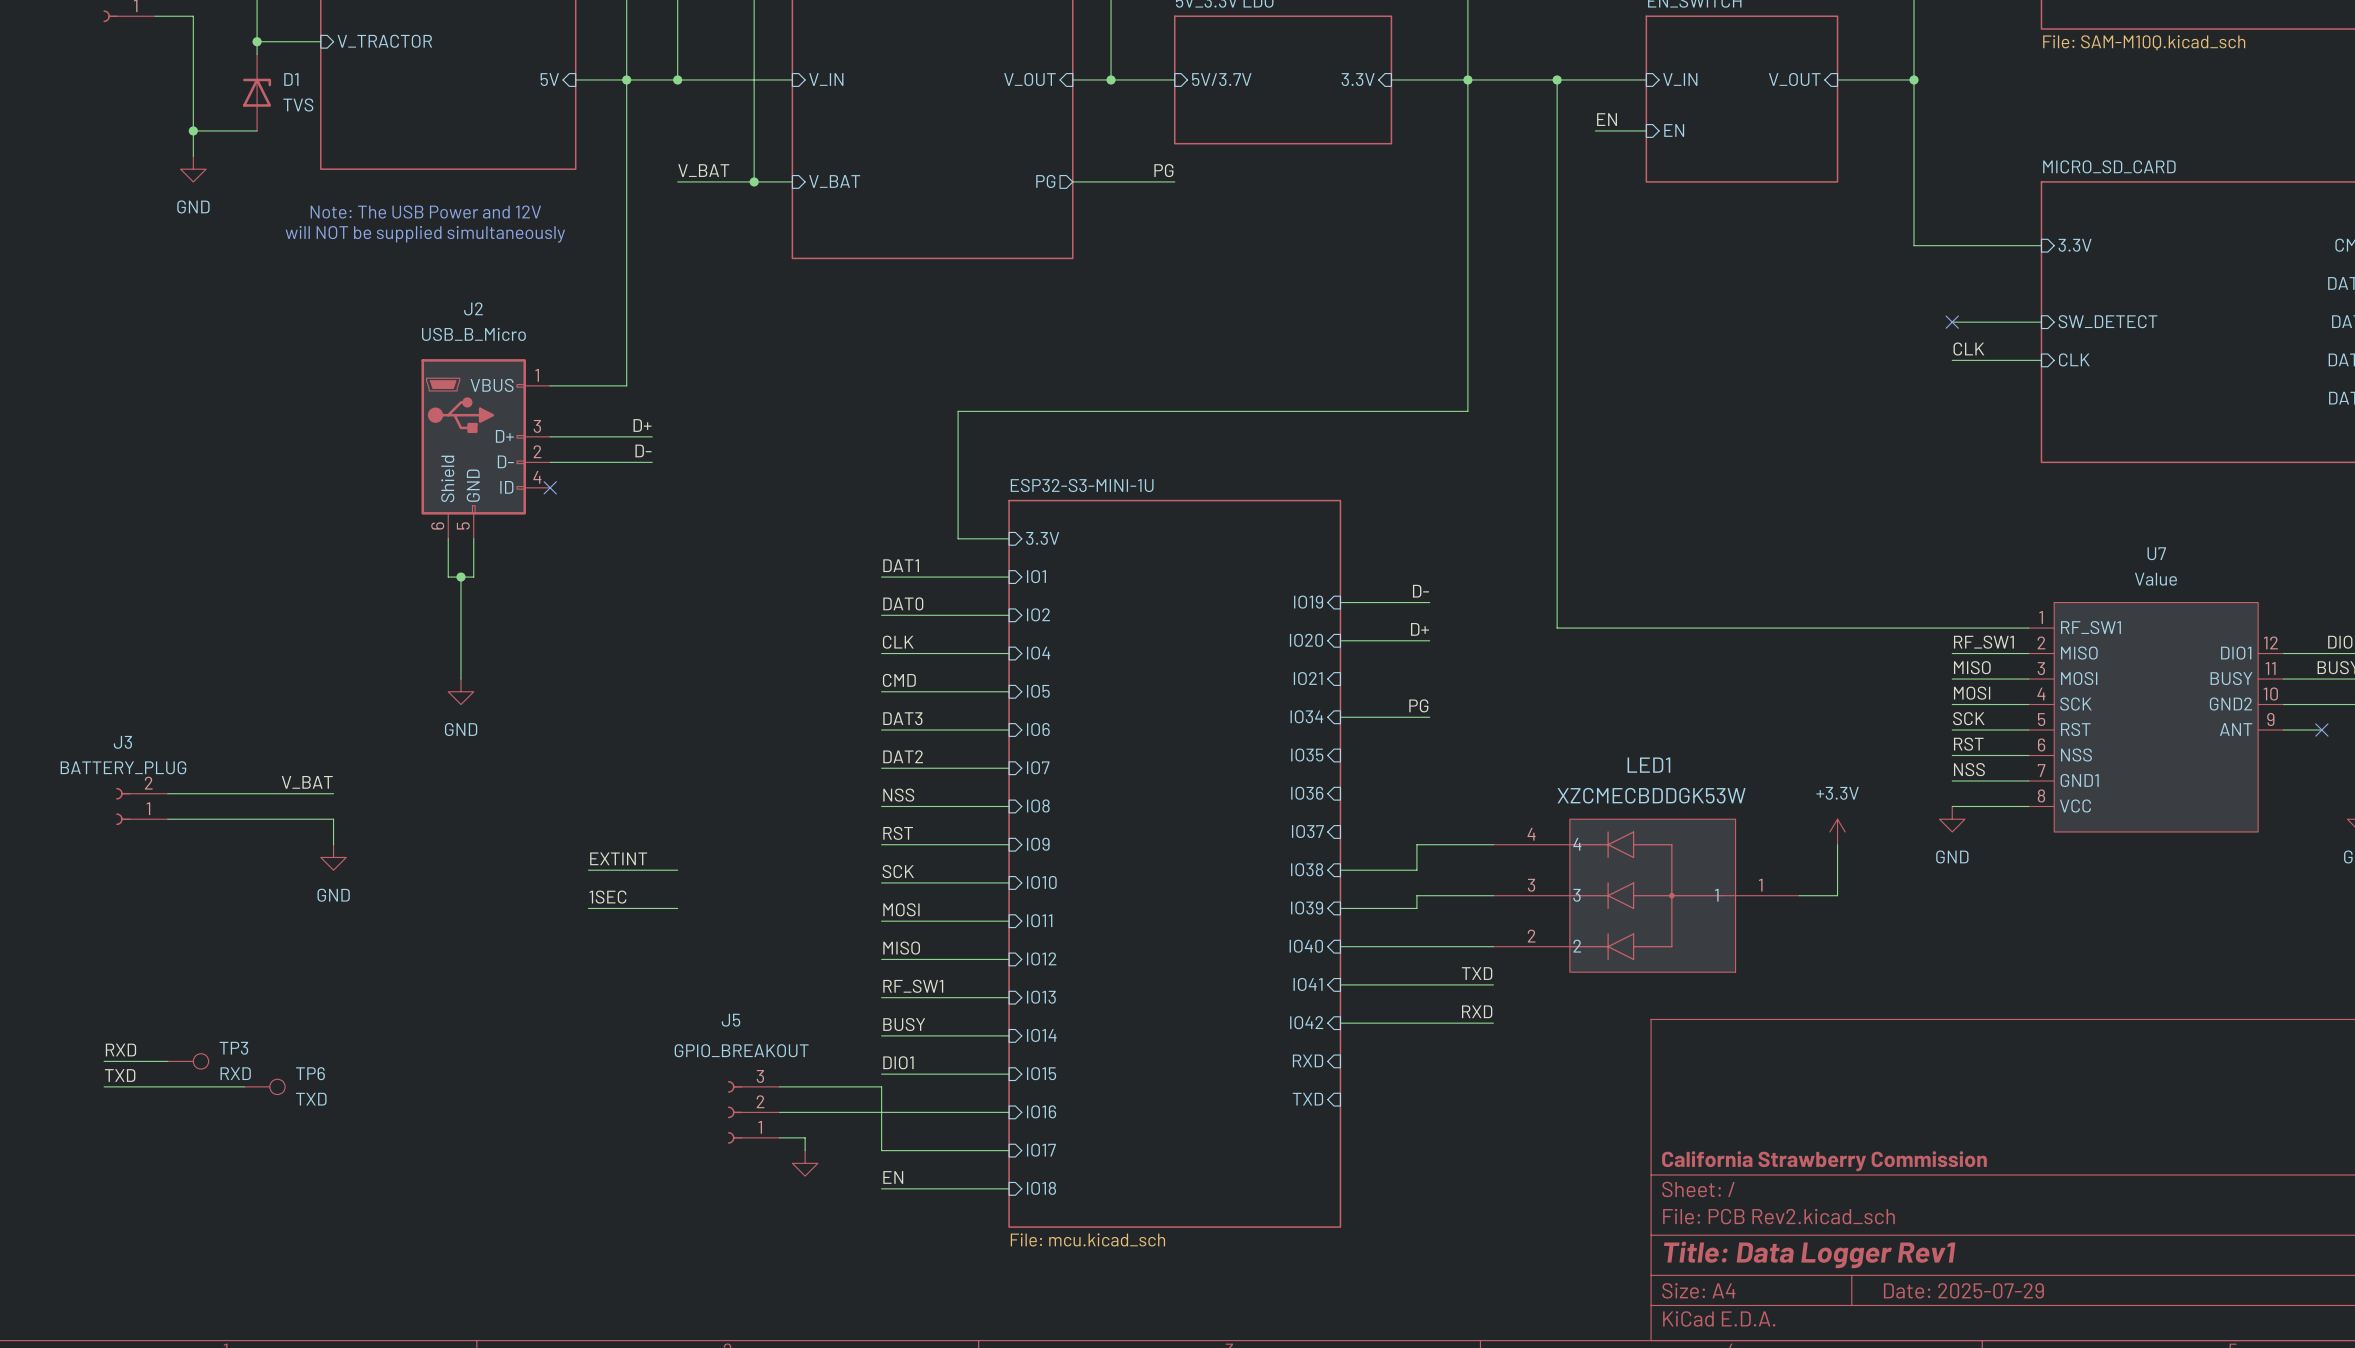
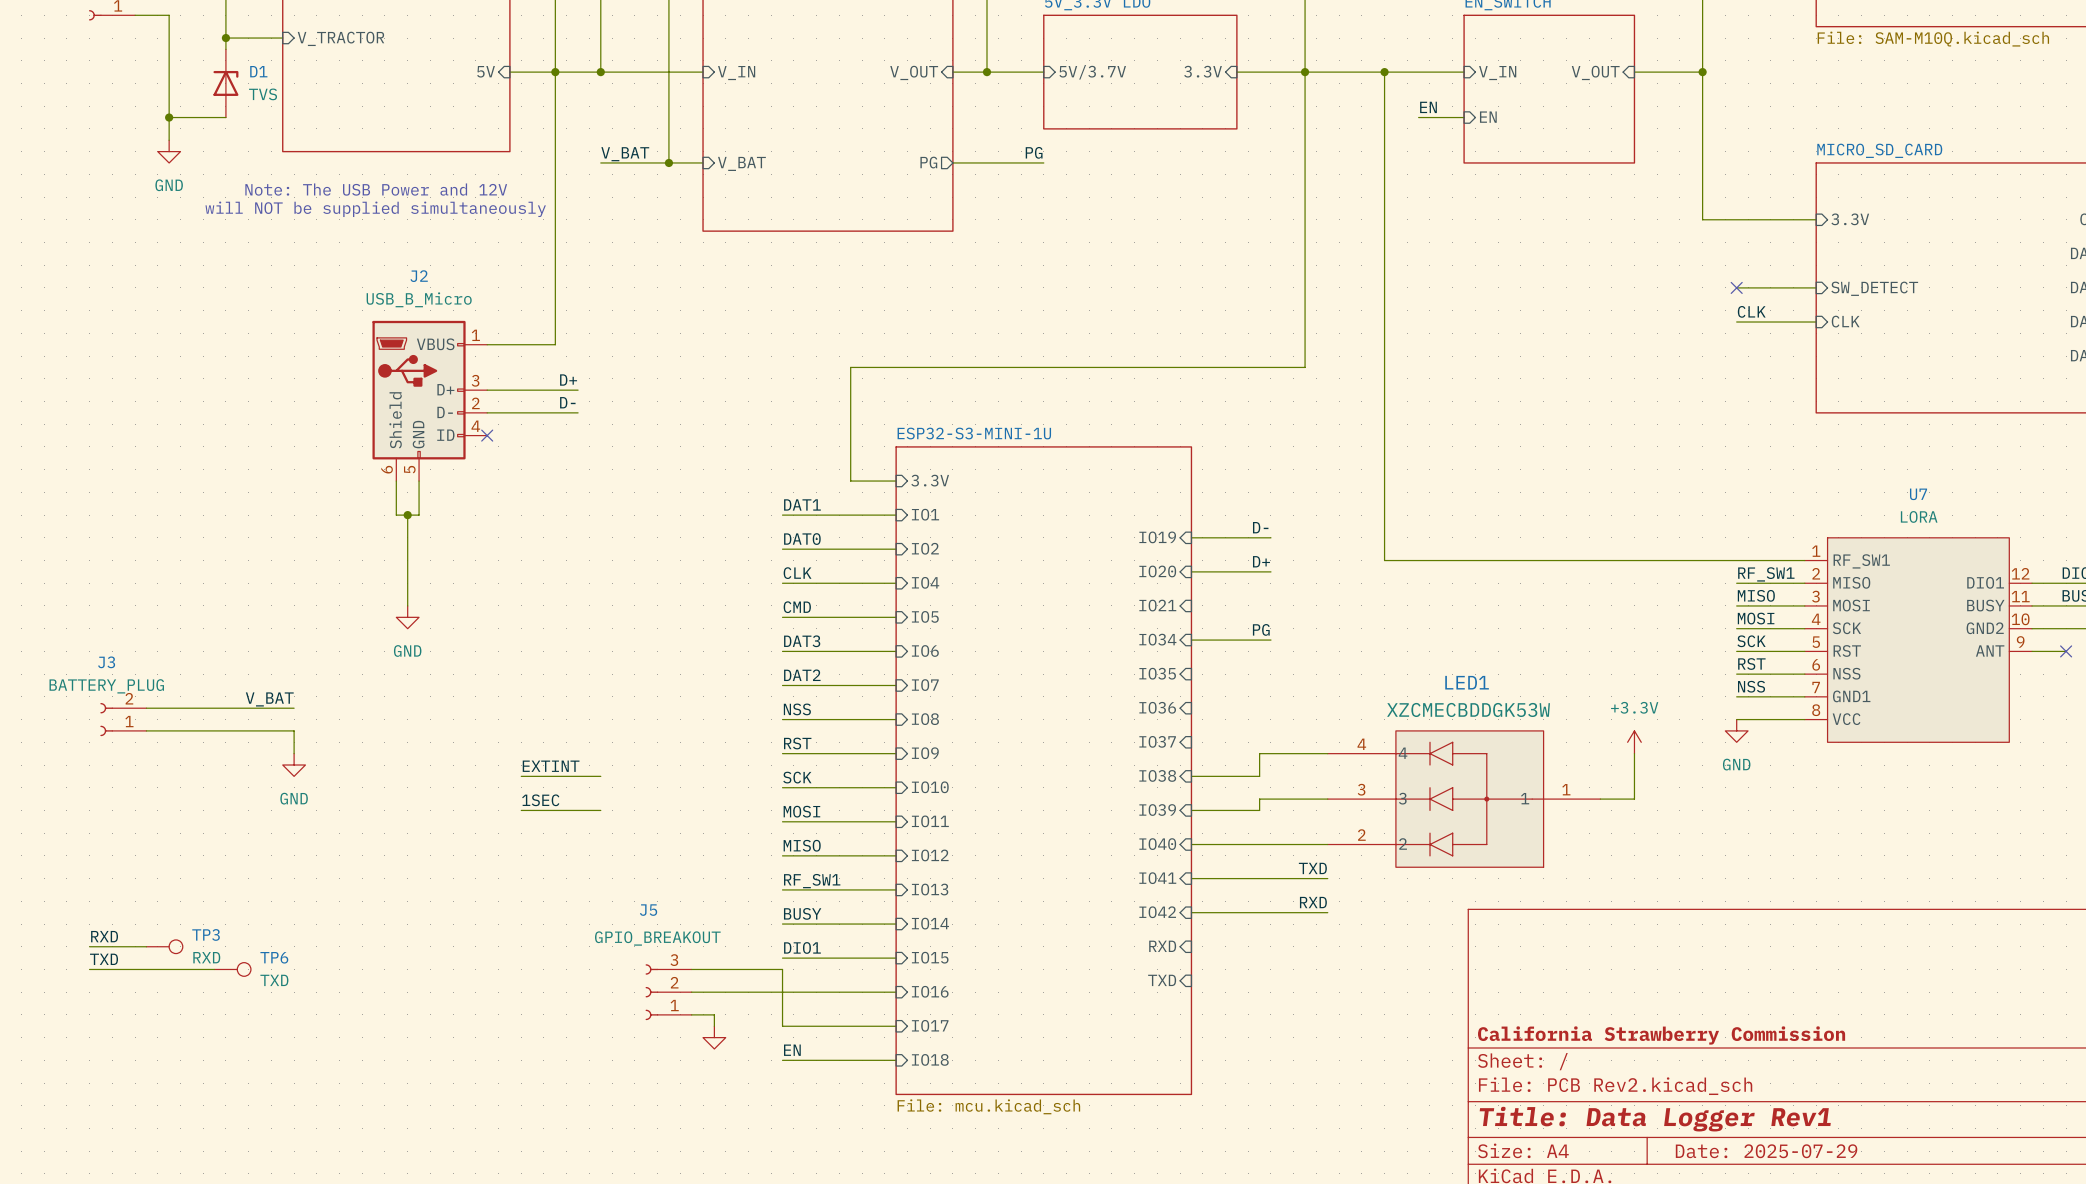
U7 value: Value (2155, 579) -> LORA (1919, 516)

